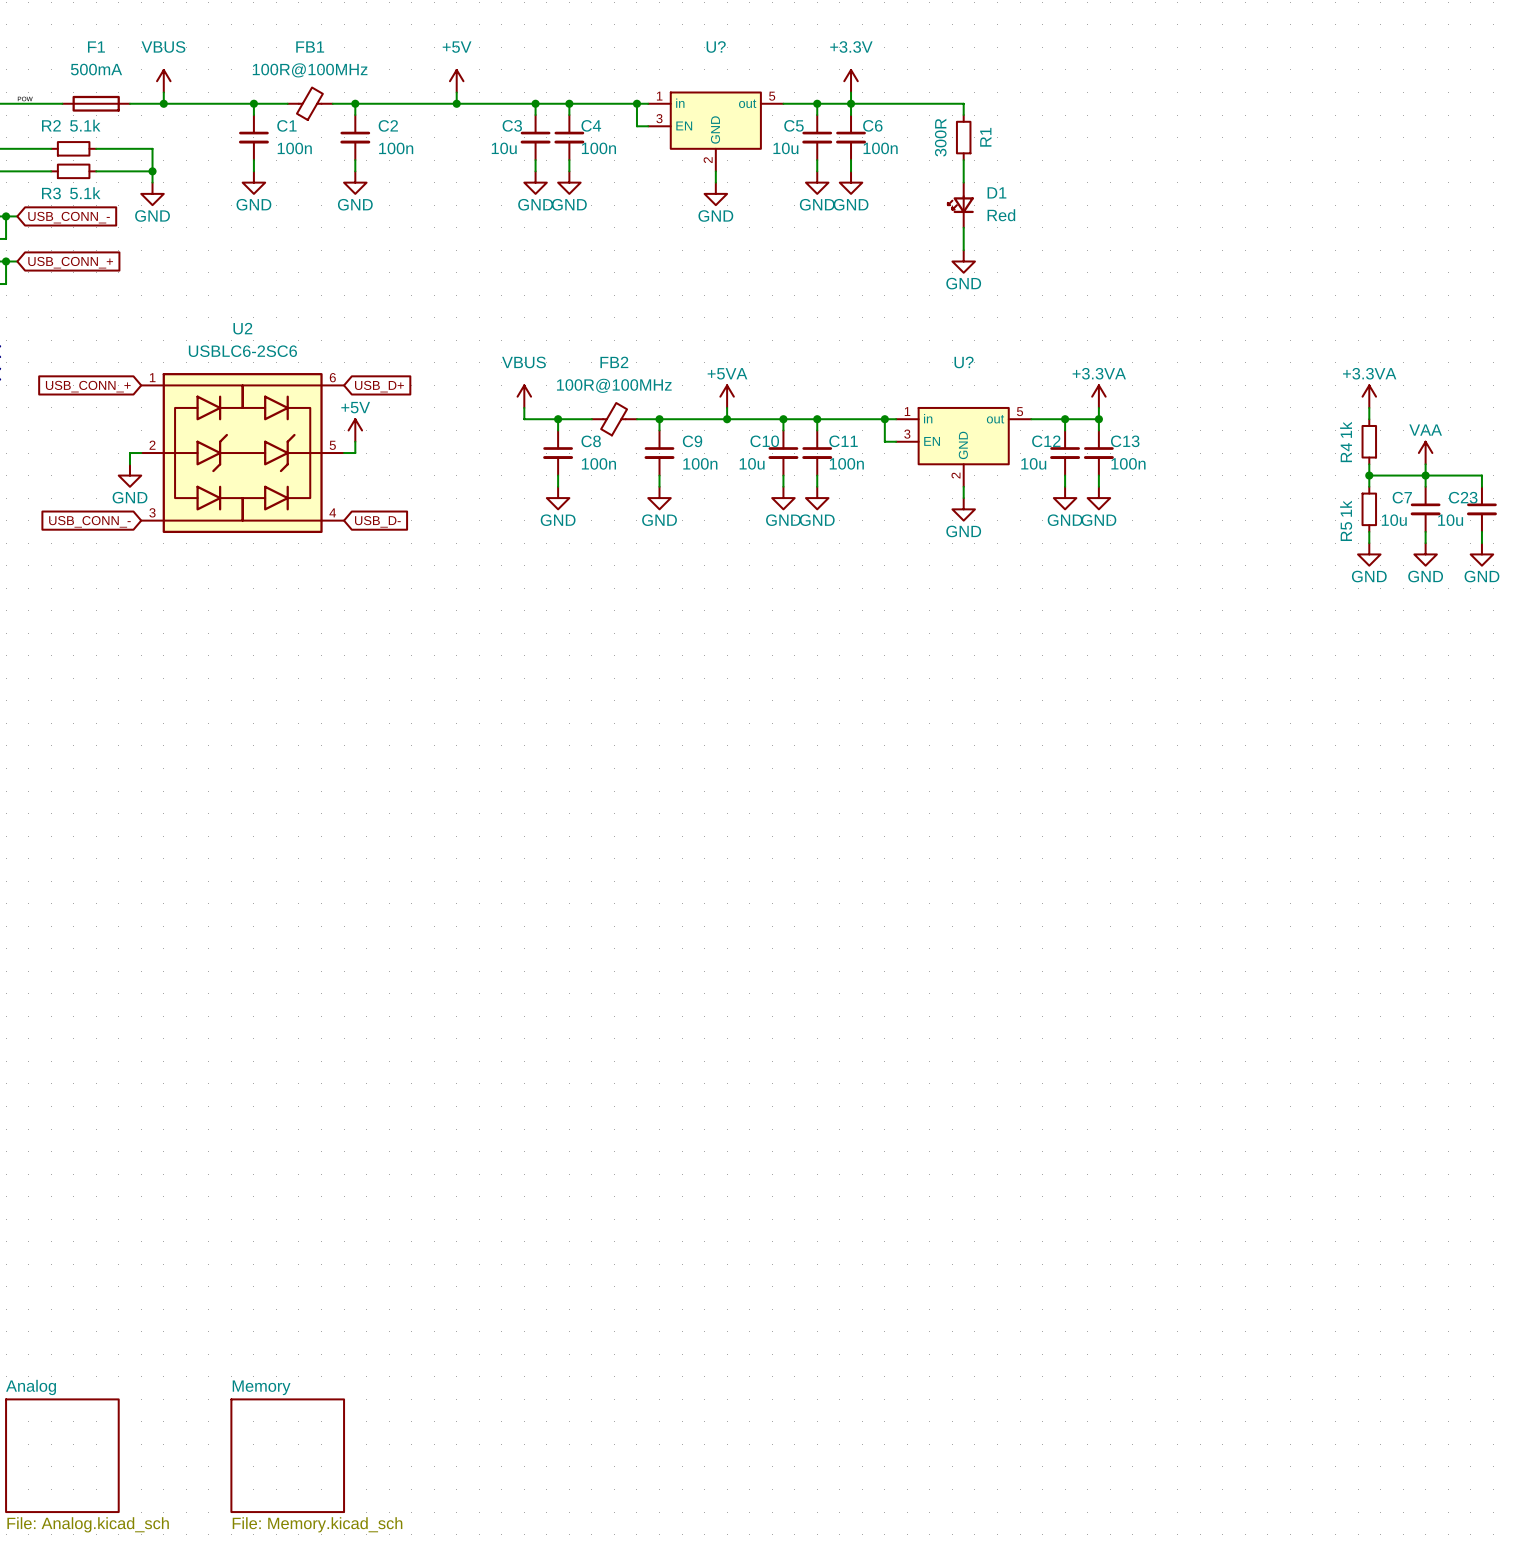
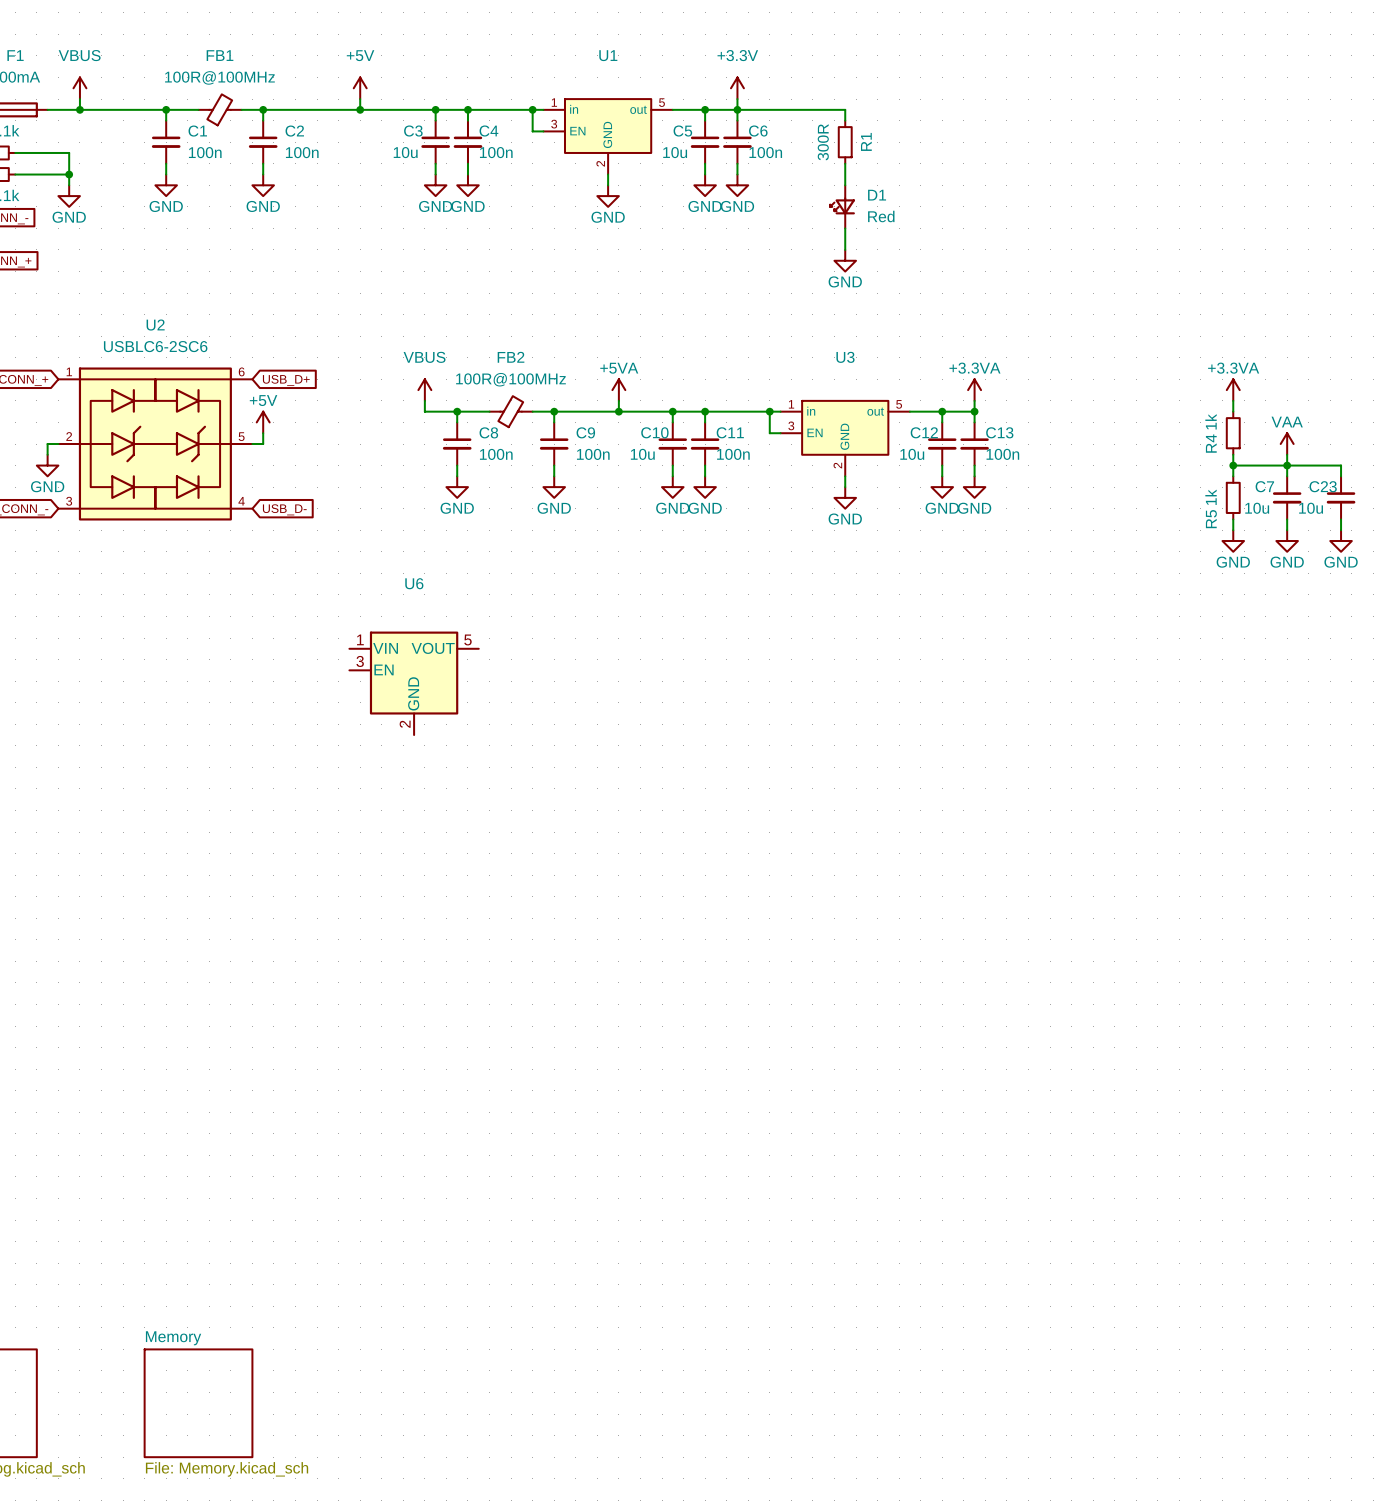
U? name: U? (716, 47) -> U1 (608, 55)
U? name: U? (964, 362) -> U3 (845, 357)
U6: none -> (414, 683)

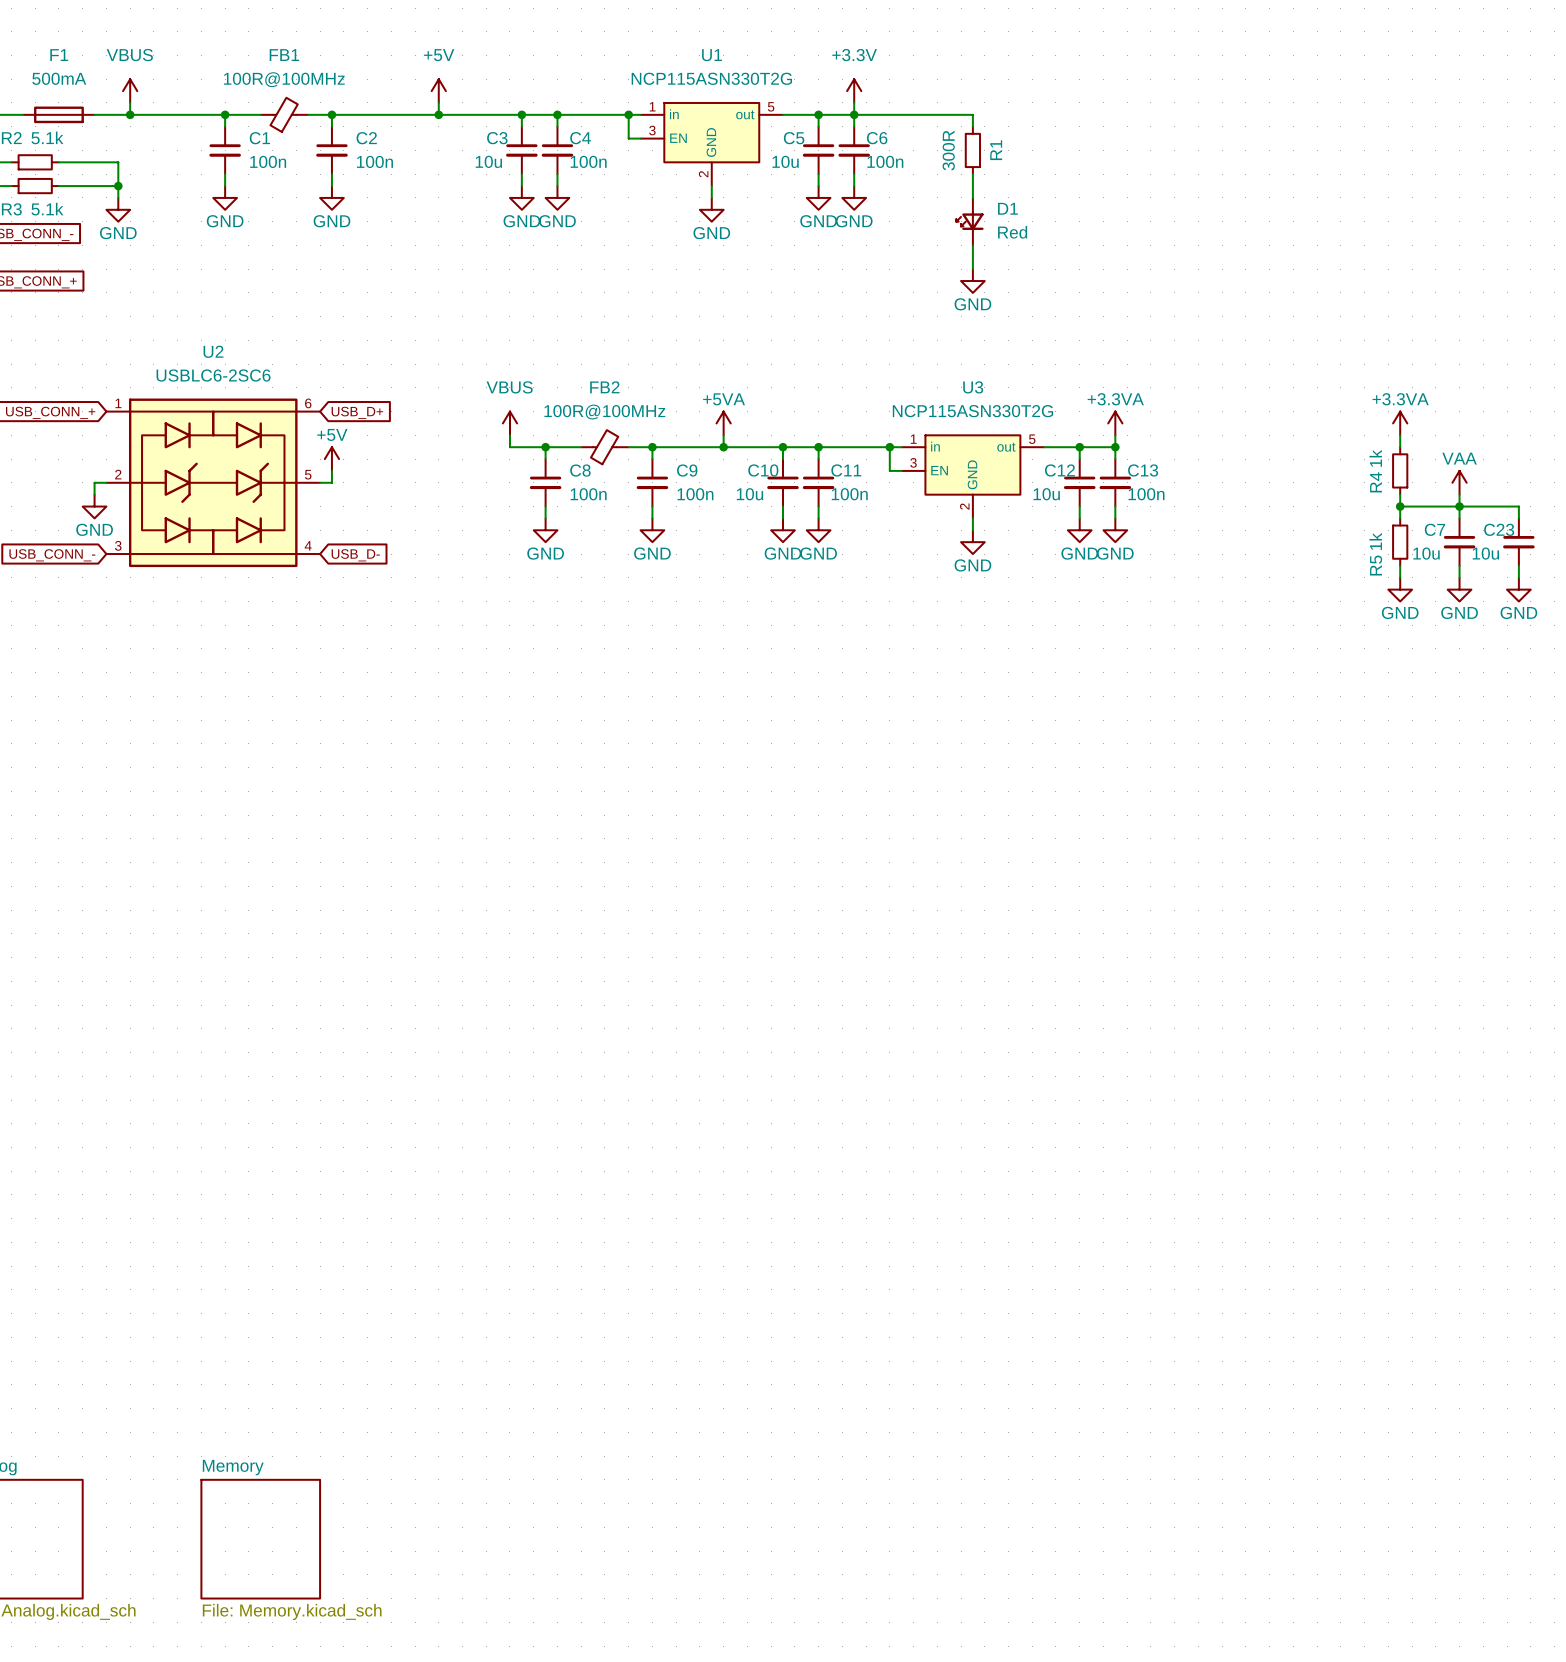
U1 value: none -> NCP115ASN330T2G (711, 78)
U3 value: none -> NCP115ASN330T2G (972, 411)
U6: (414, 683) -> none

